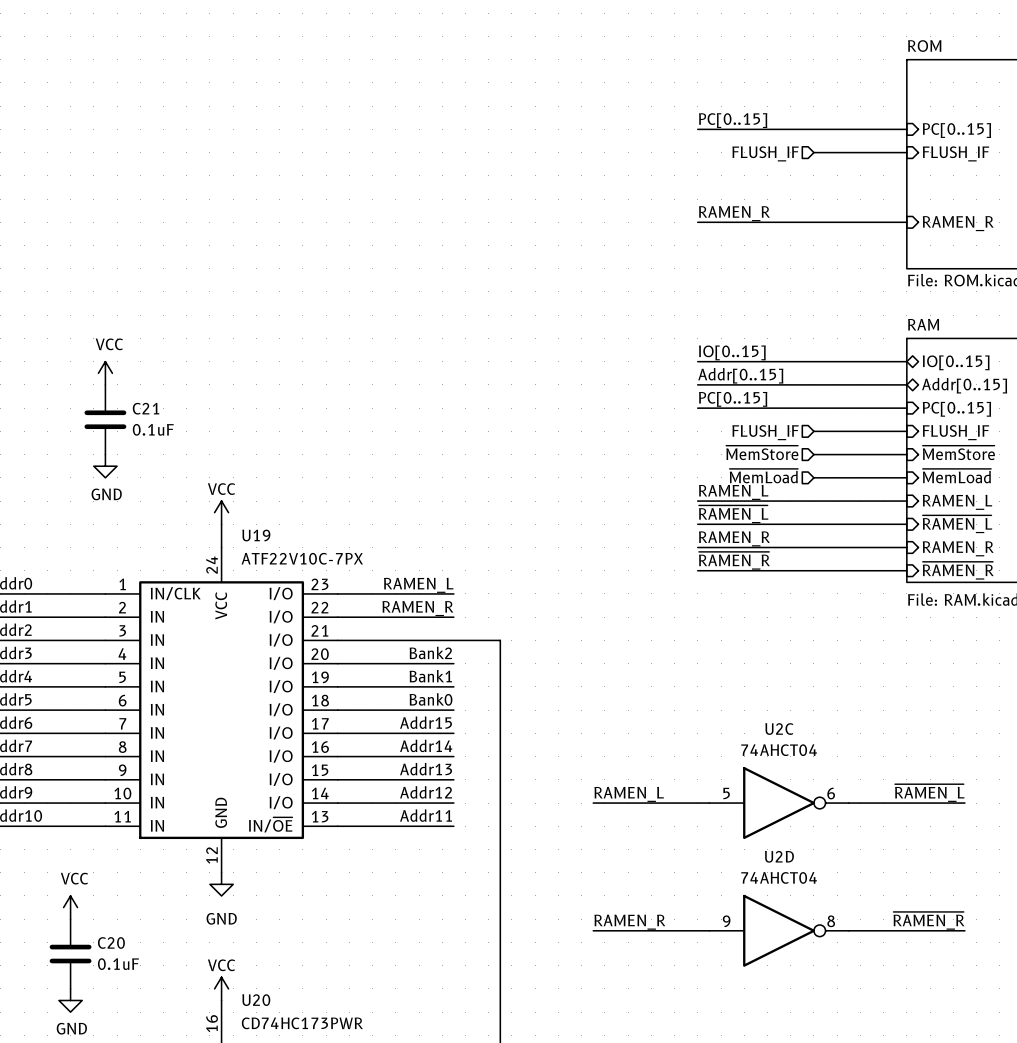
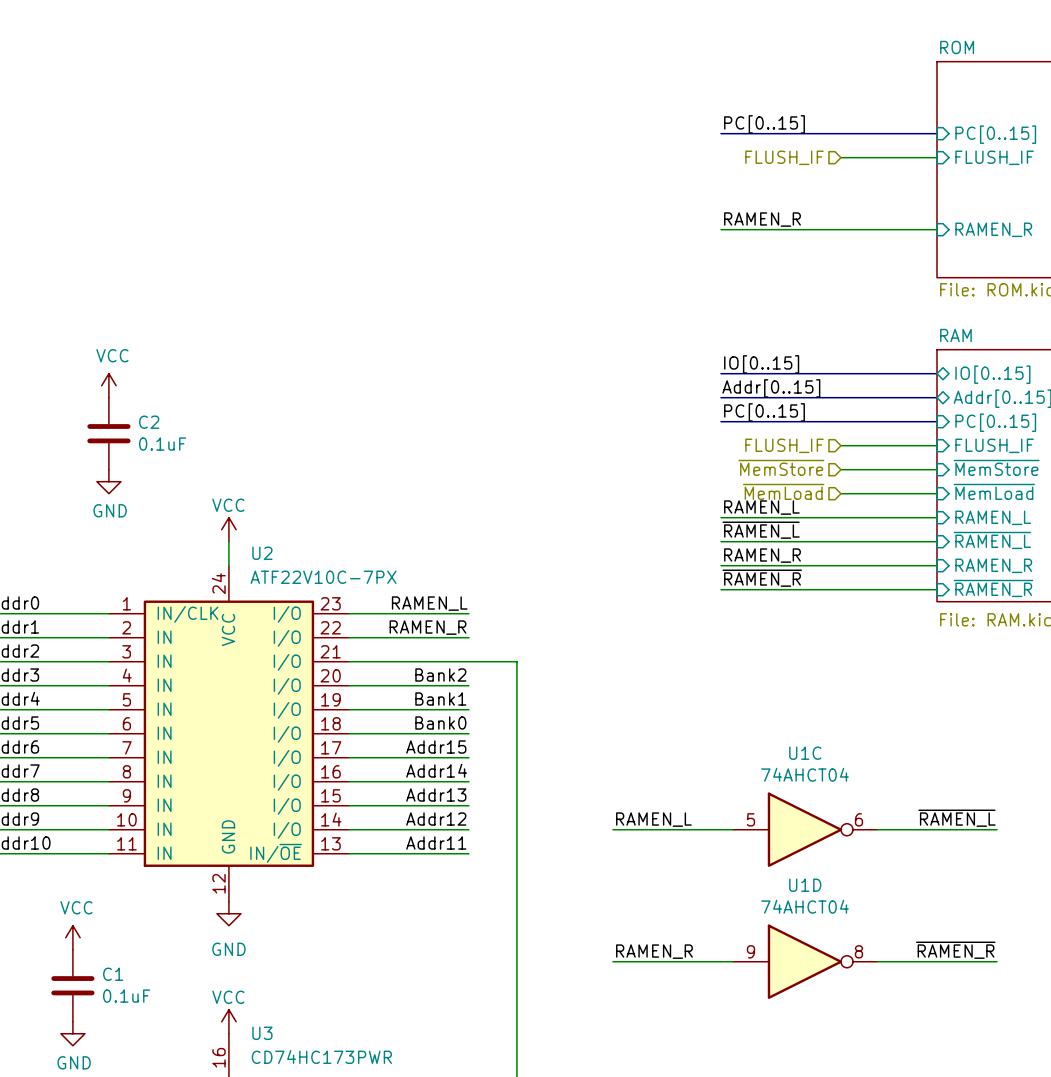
C21 name: C21 (146, 408) -> C2 (149, 422)
U19 name: U19 (256, 535) -> U2 (262, 553)
U2C name: U2C (779, 729) -> U1C (805, 753)
U2D name: U2D (779, 856) -> U1D (805, 885)
C20 name: C20 (111, 942) -> C1 (113, 974)
U20 name: U20 (256, 1000) -> U3 (262, 1033)

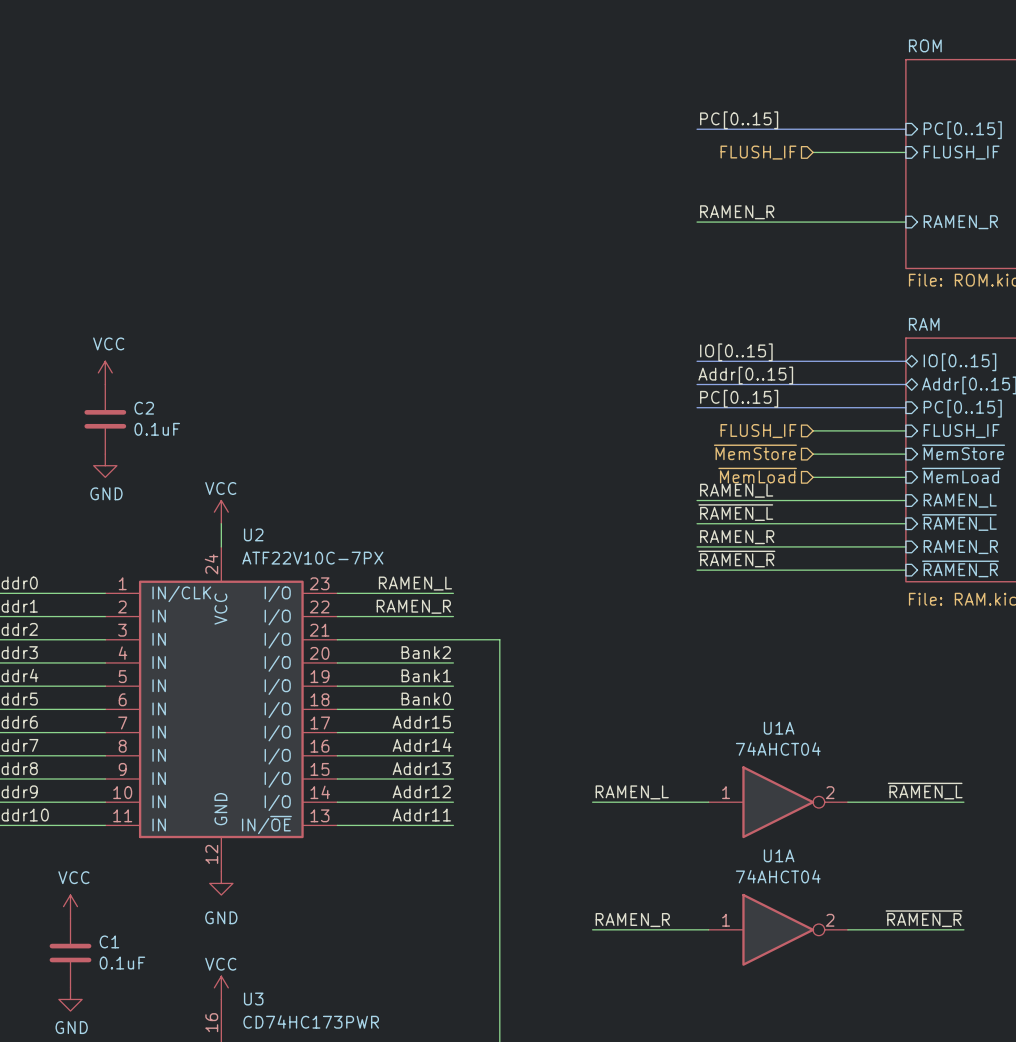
U1C name: U1C (805, 753) -> U1A (779, 728)
U1C pin number: 5 (750, 819) -> 1 (726, 792)
U1C pin number: 6 (858, 819) -> 2 (830, 792)
U1D name: U1D (805, 885) -> U1A (779, 855)
U1D pin number: 9 (750, 951) -> 1 (726, 920)
U1D pin number: 8 (858, 951) -> 2 (830, 920)

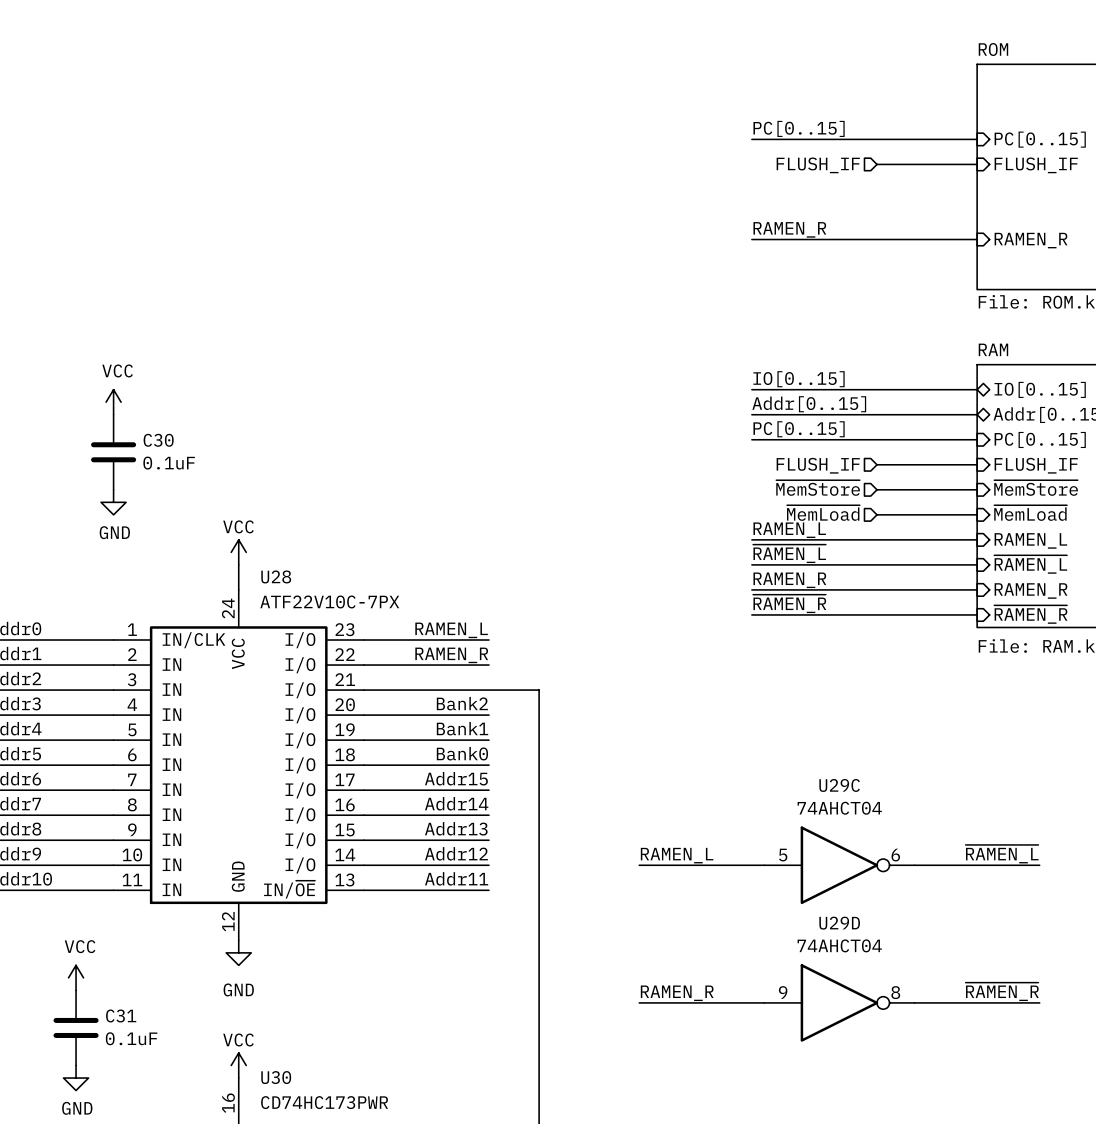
C2 name: C2 (144, 408) -> C30 (158, 440)
U2 name: U2 (253, 534) -> U28 (276, 576)
U1A name: U1A (779, 728) -> U29C (839, 785)
U1A pin number: 1 (726, 792) -> 5 (783, 855)
U1A pin number: 2 (830, 792) -> 6 (895, 855)
U1A name: U1A (779, 855) -> U29D (839, 923)
U1A pin number: 1 (726, 920) -> 9 (783, 992)
U1A pin number: 2 (830, 920) -> 8 (895, 992)
C1 name: C1 (109, 941) -> C31 (121, 1015)
U3 name: U3 (253, 999) -> U30 (276, 1077)

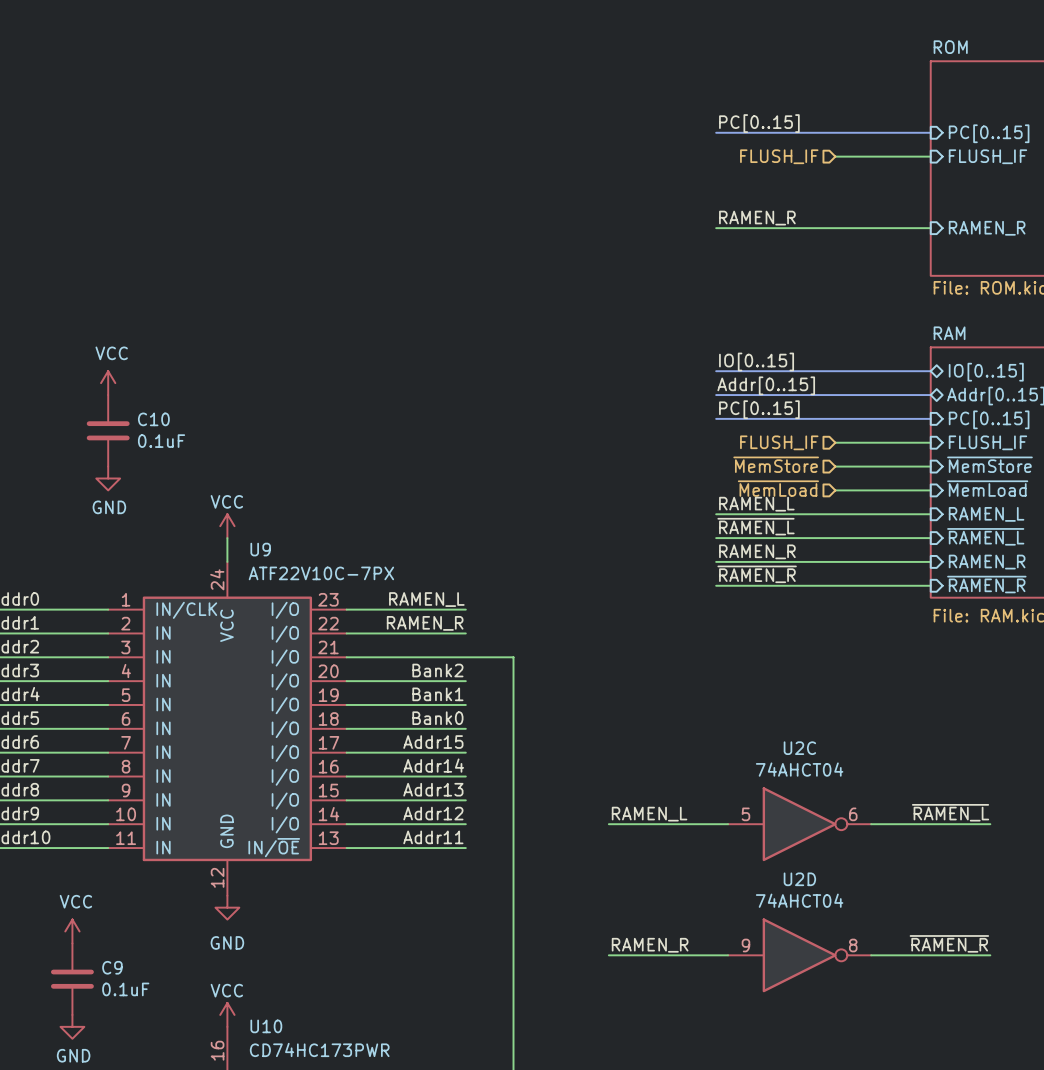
C30 name: C30 (158, 440) -> C10 (153, 419)
U28 name: U28 (276, 576) -> U9 (260, 549)
U29C name: U29C (839, 785) -> U2C (799, 748)
U29D name: U29D (839, 923) -> U2D (799, 879)
C31 name: C31 (121, 1015) -> C9 (112, 967)
U30 name: U30 (276, 1077) -> U10 (266, 1026)

